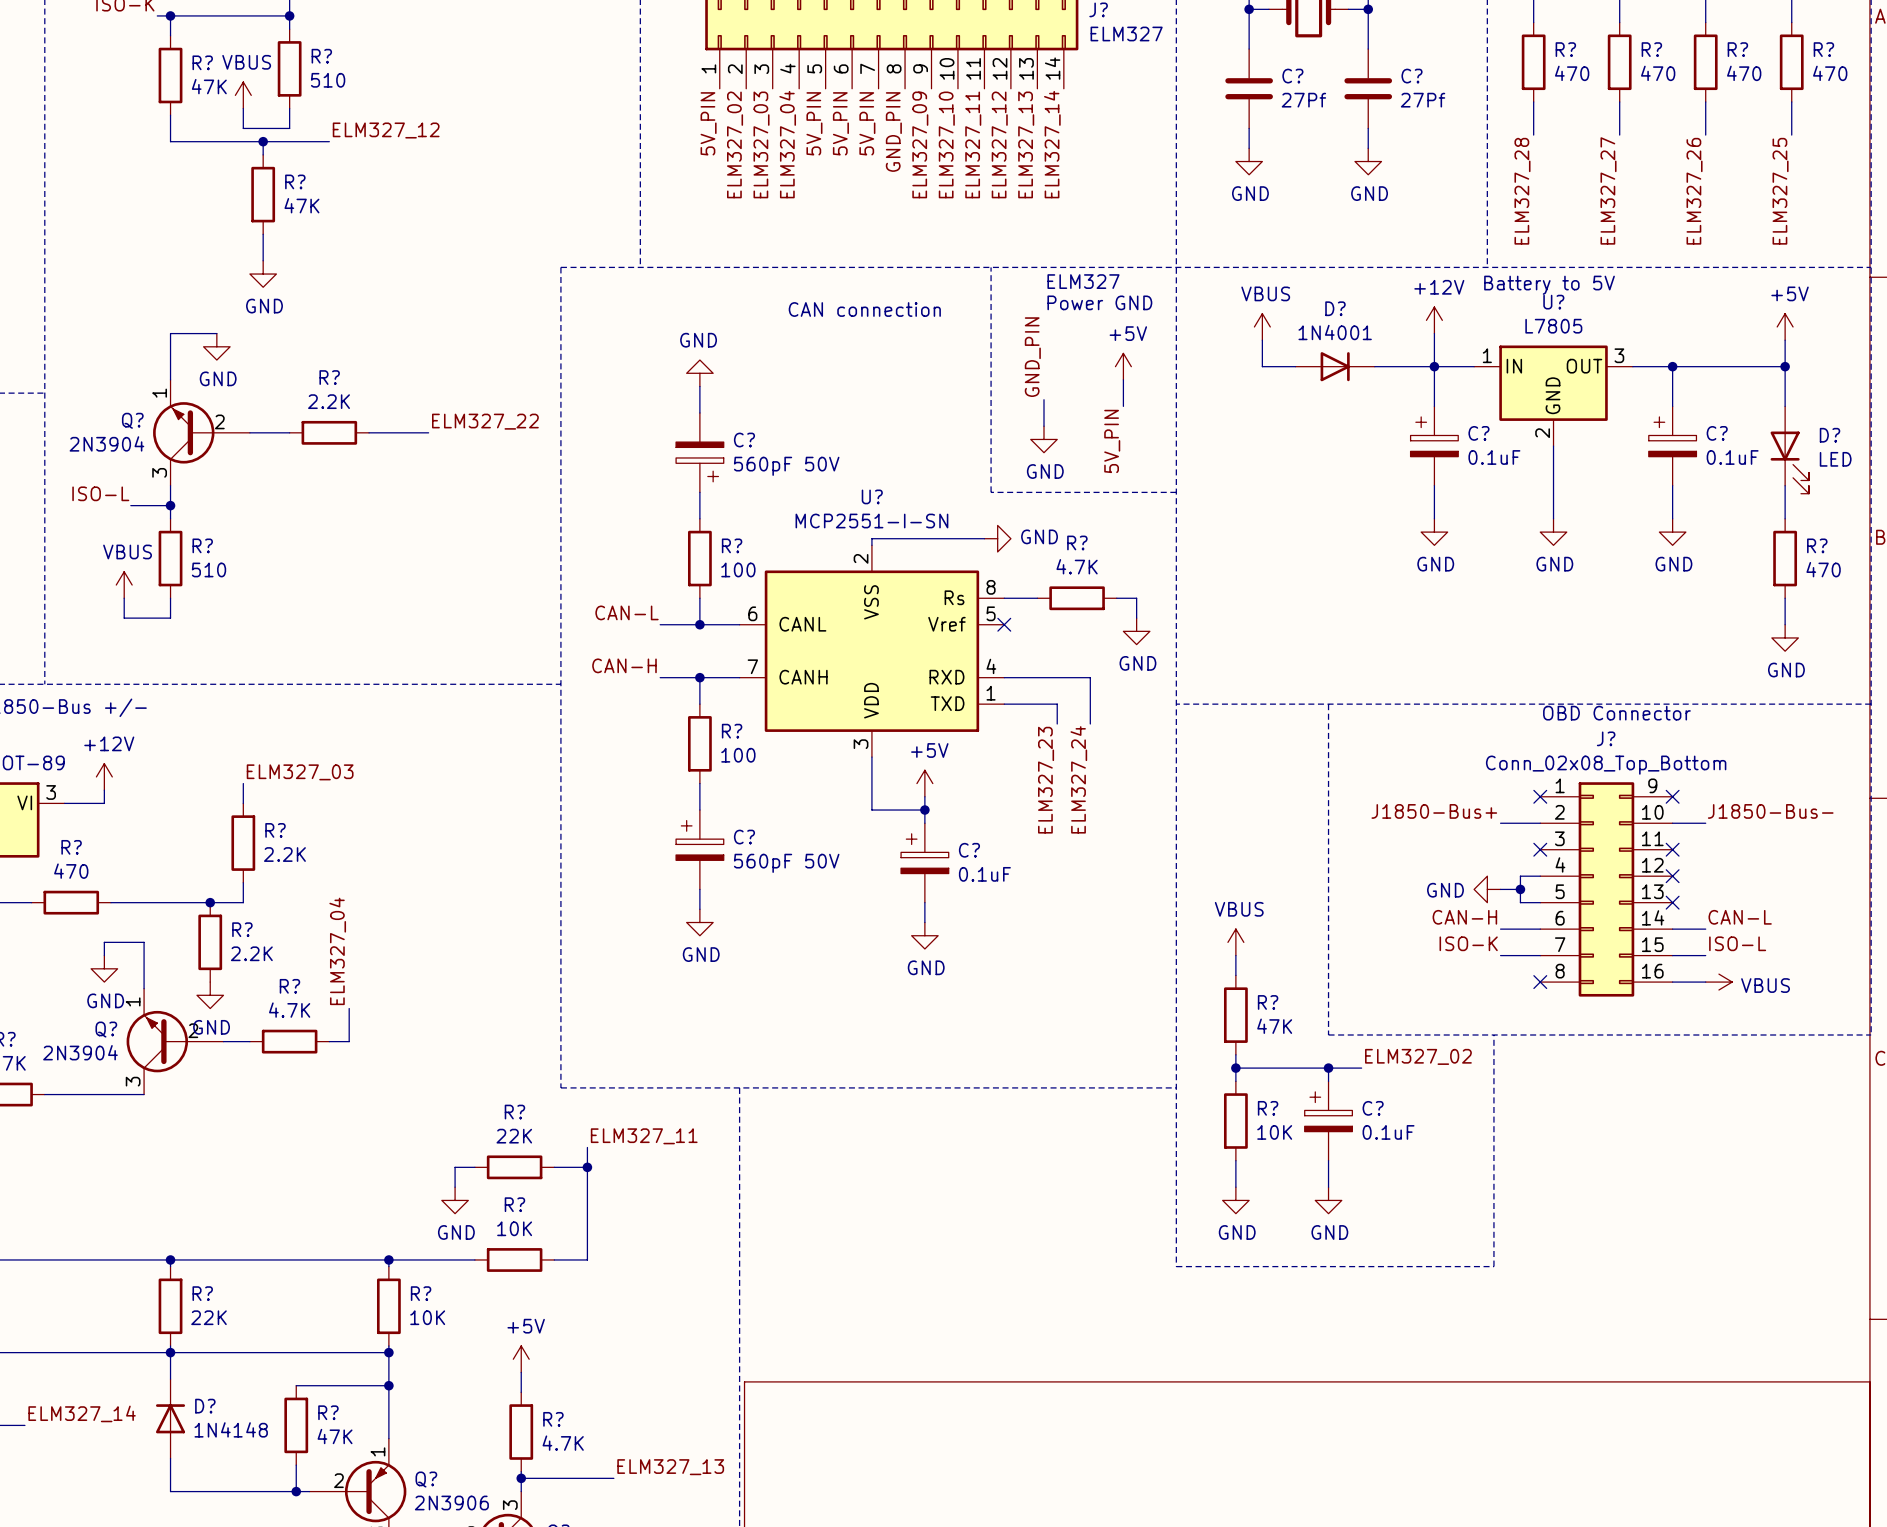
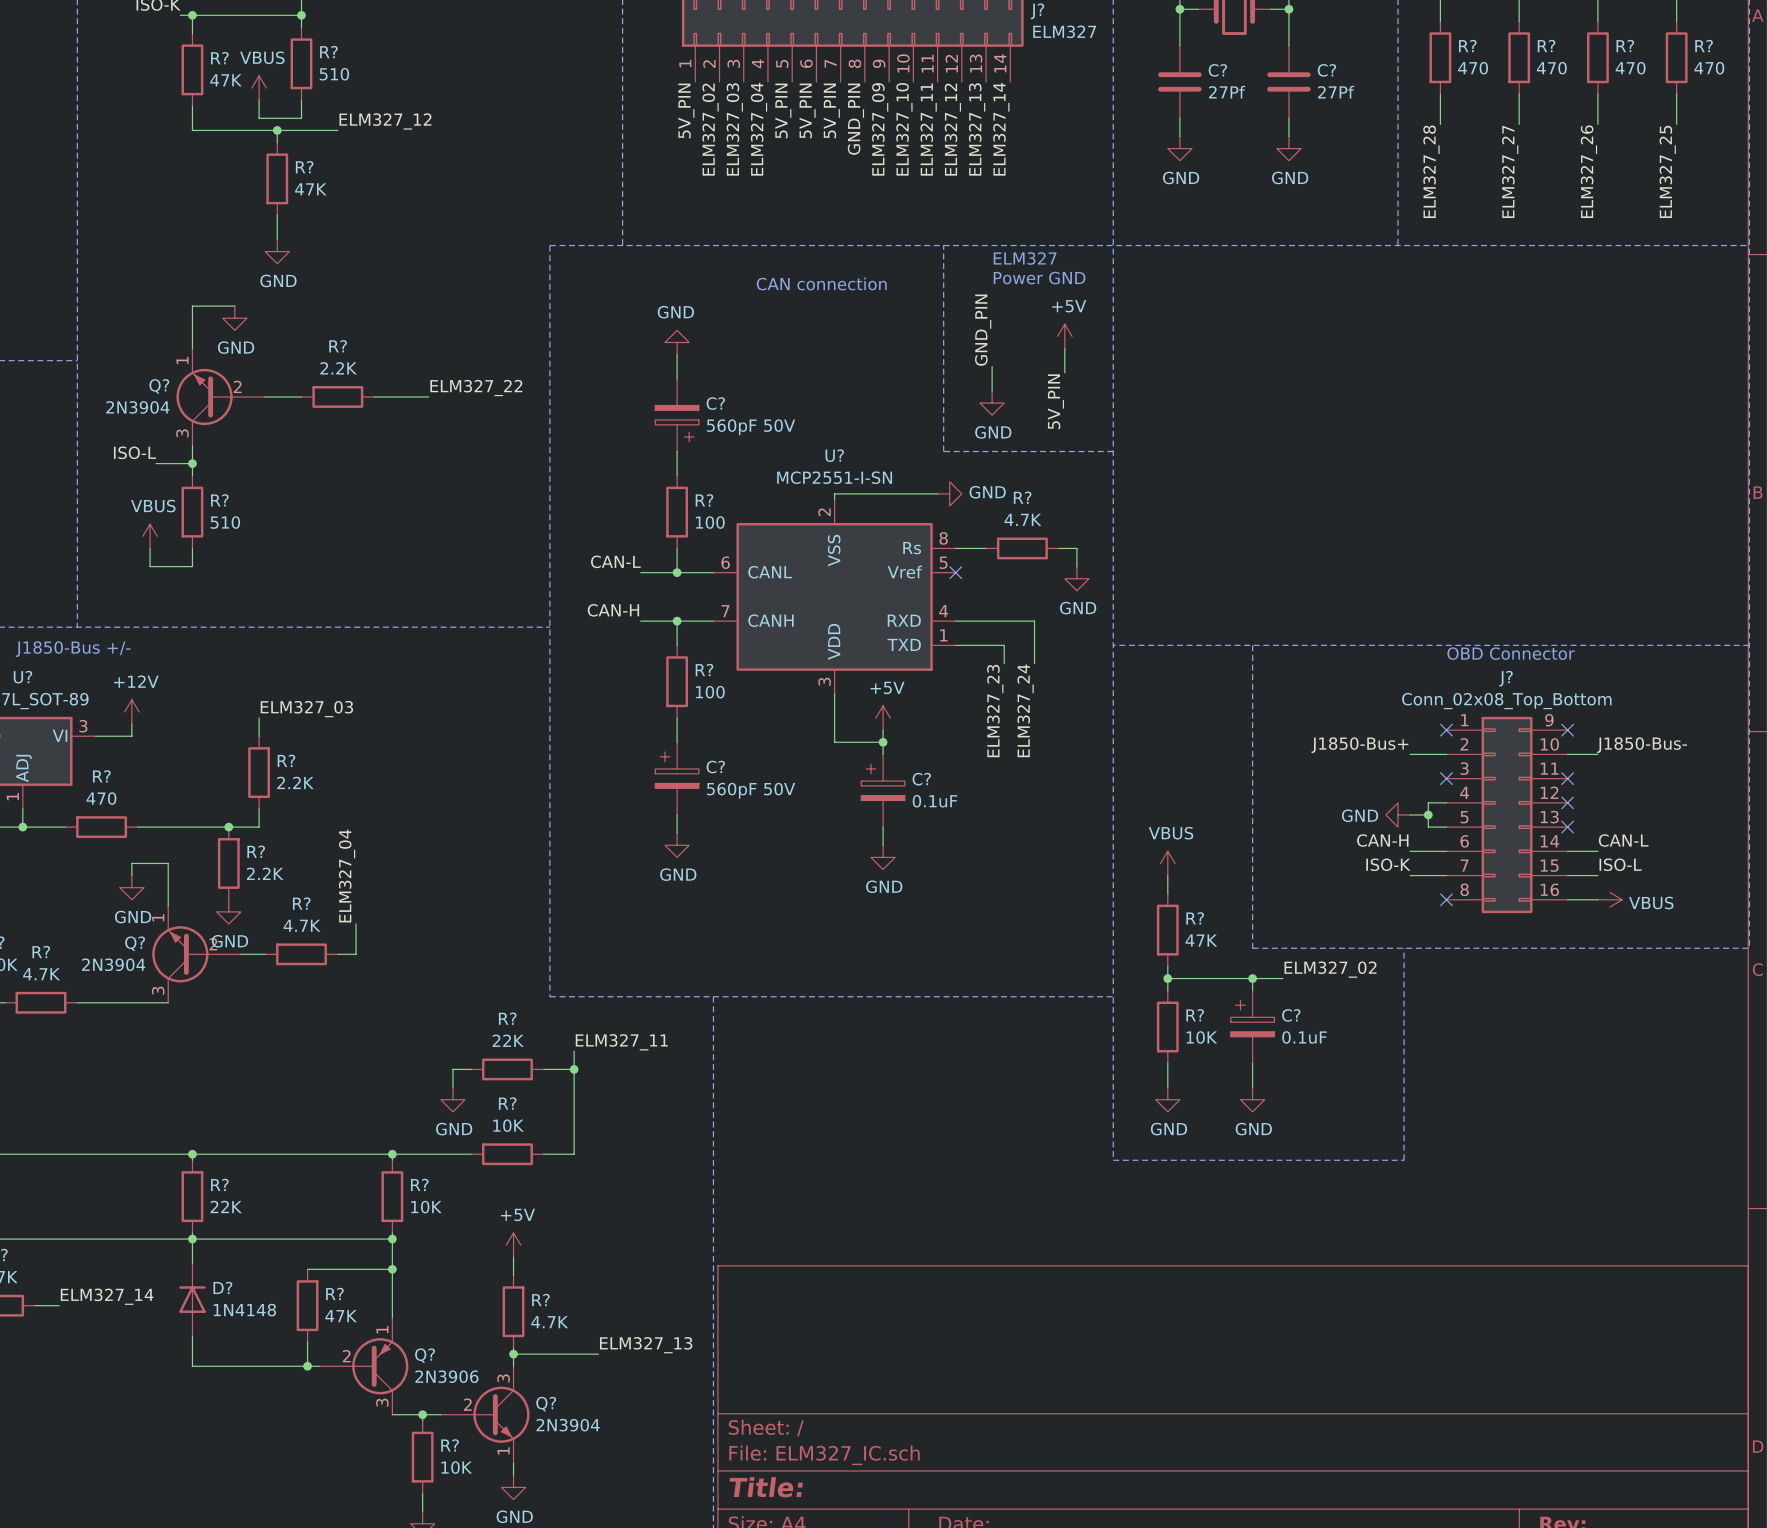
text: Battery to 5V (1549, 285) -> none
power symbol: +12V (1434, 320) -> none
power symbol: VBUS (1262, 326) -> none
power symbol: +5V (1785, 326) -> none
wire: (1434, 333) (1434, 406) -> none
wire: (1262, 340) (1262, 366) (1295, 366) -> none
wire: (1785, 340) (1785, 406) -> none
D?: 1N4001 (1335, 366) -> none
wire: (1374, 366) (1474, 366) -> none
junction: (1434, 366) -> none
wire: (1632, 366) (1785, 366) -> none
wire: (1672, 366) (1672, 406) -> none
junction: (1672, 366) -> none
junction: (1785, 366) -> none
U?: L7805 (1553, 395) -> none
C?: 0.1uF (1434, 446) -> none
wire: (1553, 446) (1553, 518) -> none
C?: 0.1uF (1672, 446) -> none
D?: LED (1789, 450) -> none
wire: (1434, 485) (1434, 518) -> none
wire: (1672, 485) (1672, 518) -> none
wire: (1785, 485) (1785, 518) -> none
power symbol: GND (1434, 532) -> none
power symbol: GND (1553, 532) -> none
power symbol: GND (1672, 532) -> none
R?: 470 (1785, 558) -> none
wire: (1785, 598) (1785, 624) -> none
power symbol: GND (1785, 637) -> none

